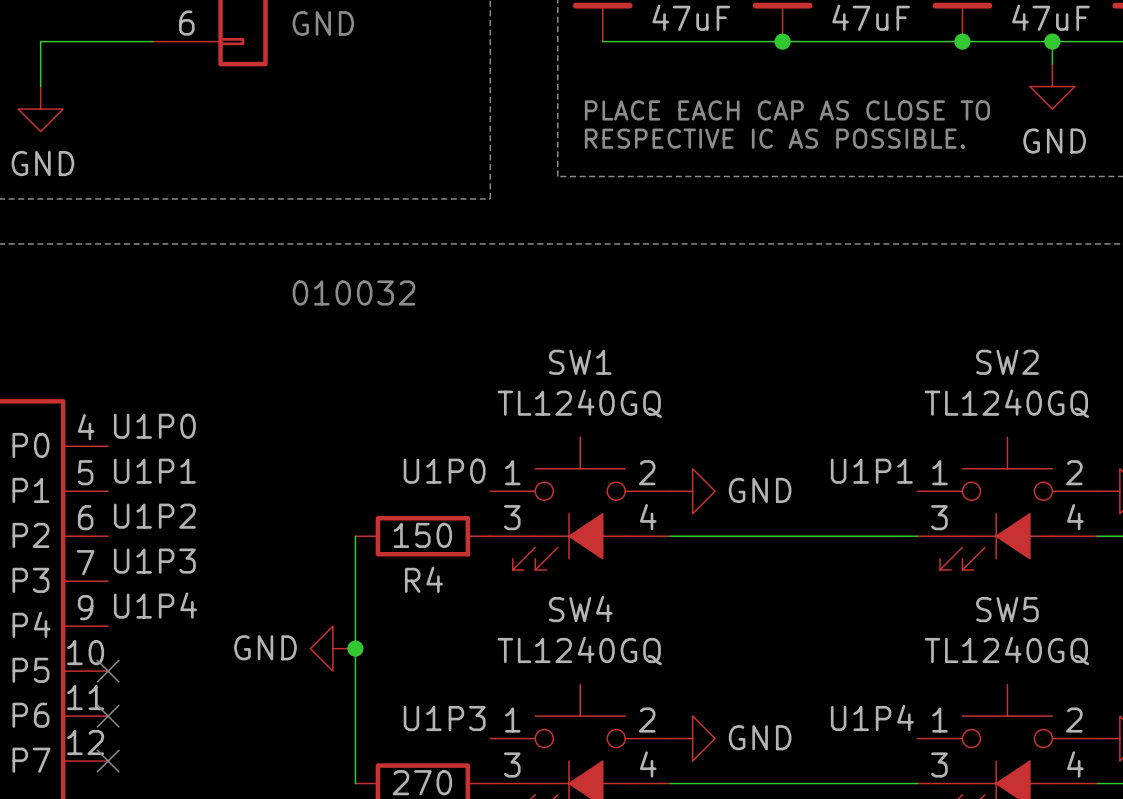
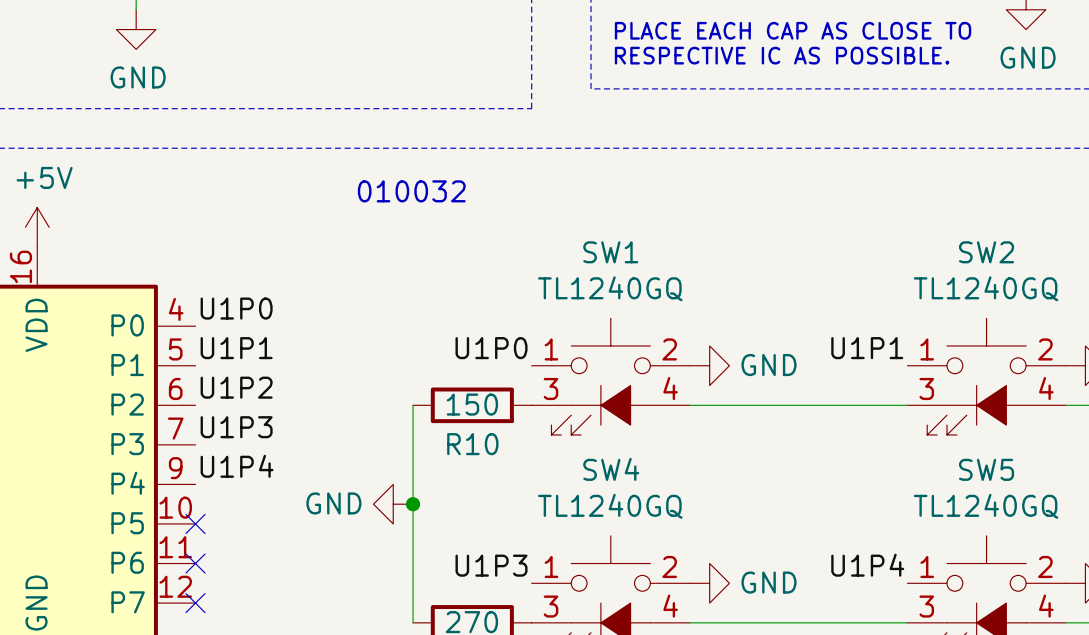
R4 name: R4 (423, 579) -> R10 (472, 444)

